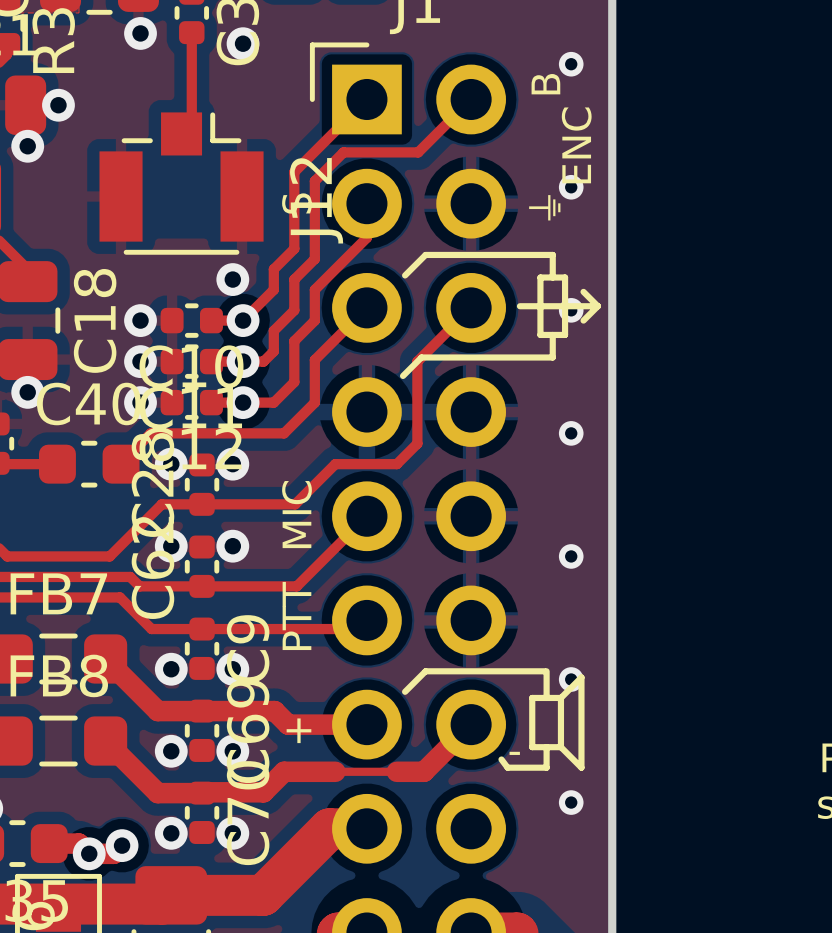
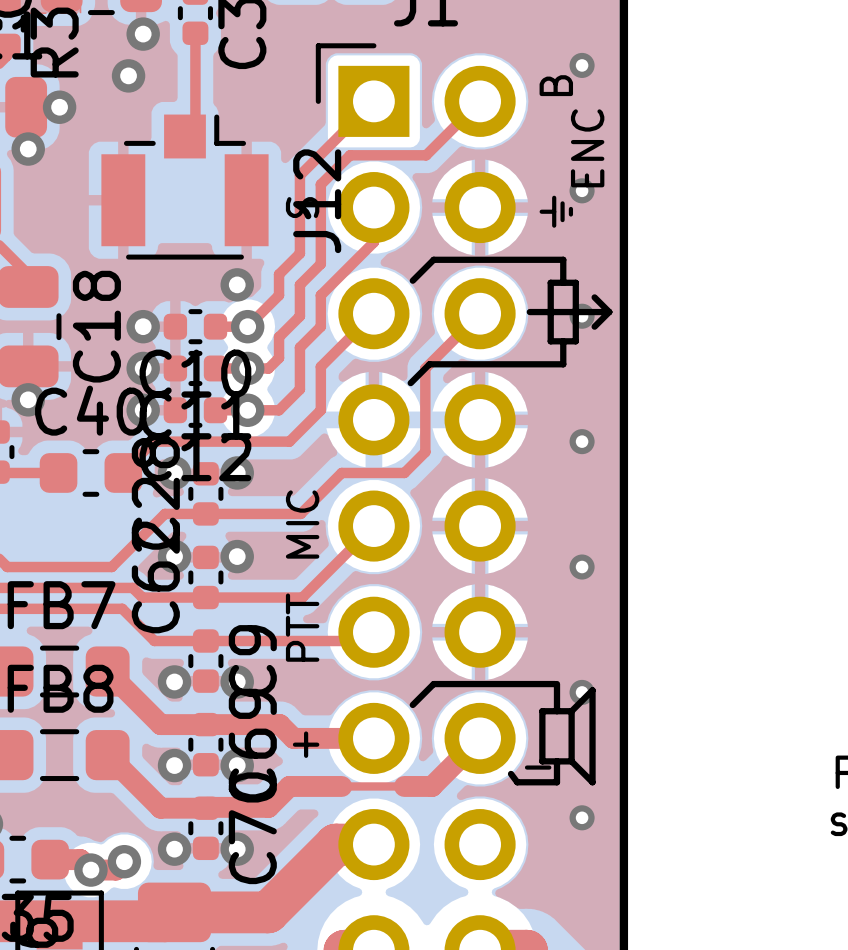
via position: (243, 43) -> (128, 75)

